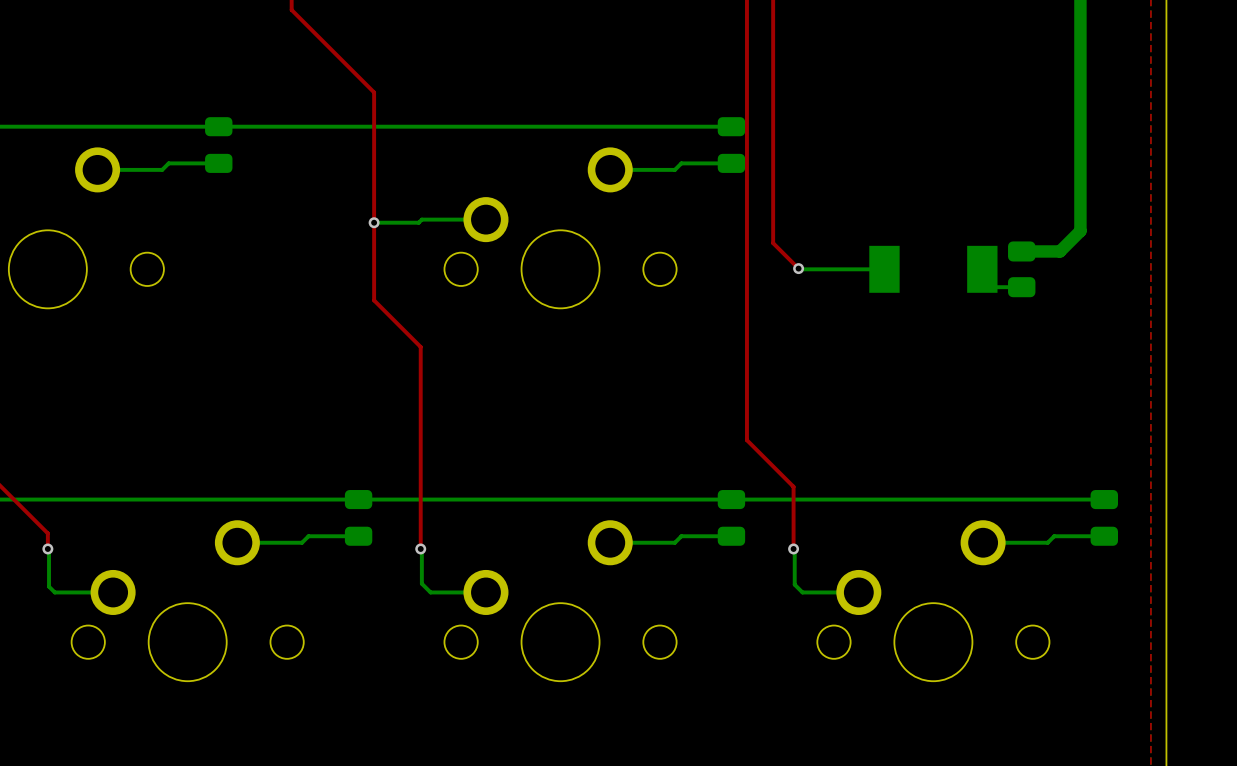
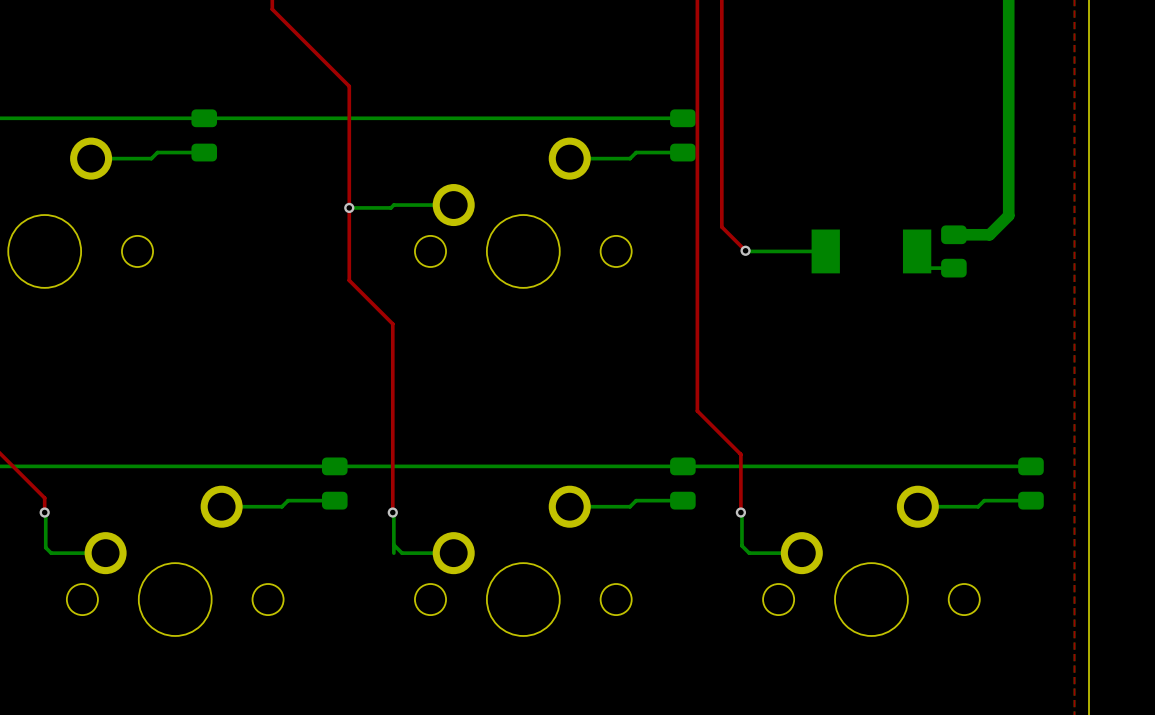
bottom track: none -> (393, 544) (393, 553)

